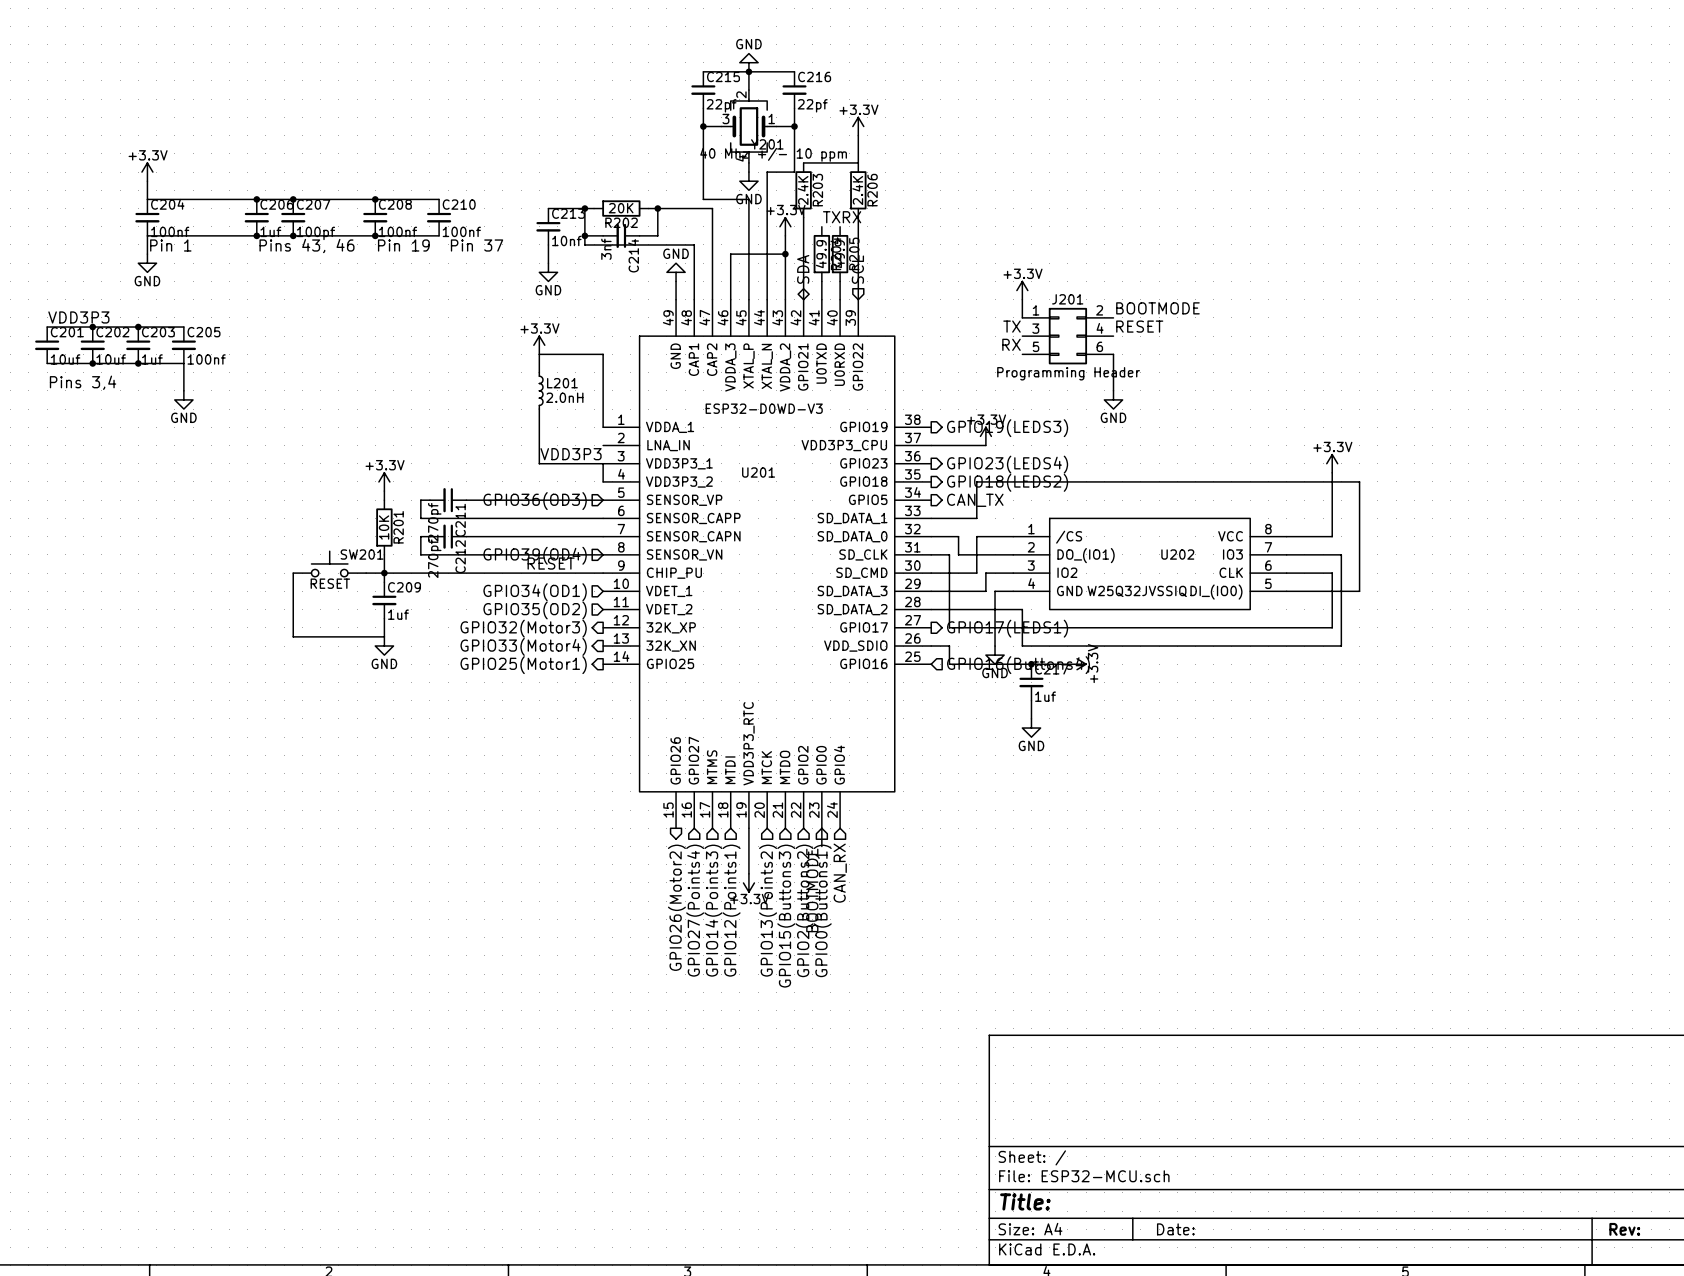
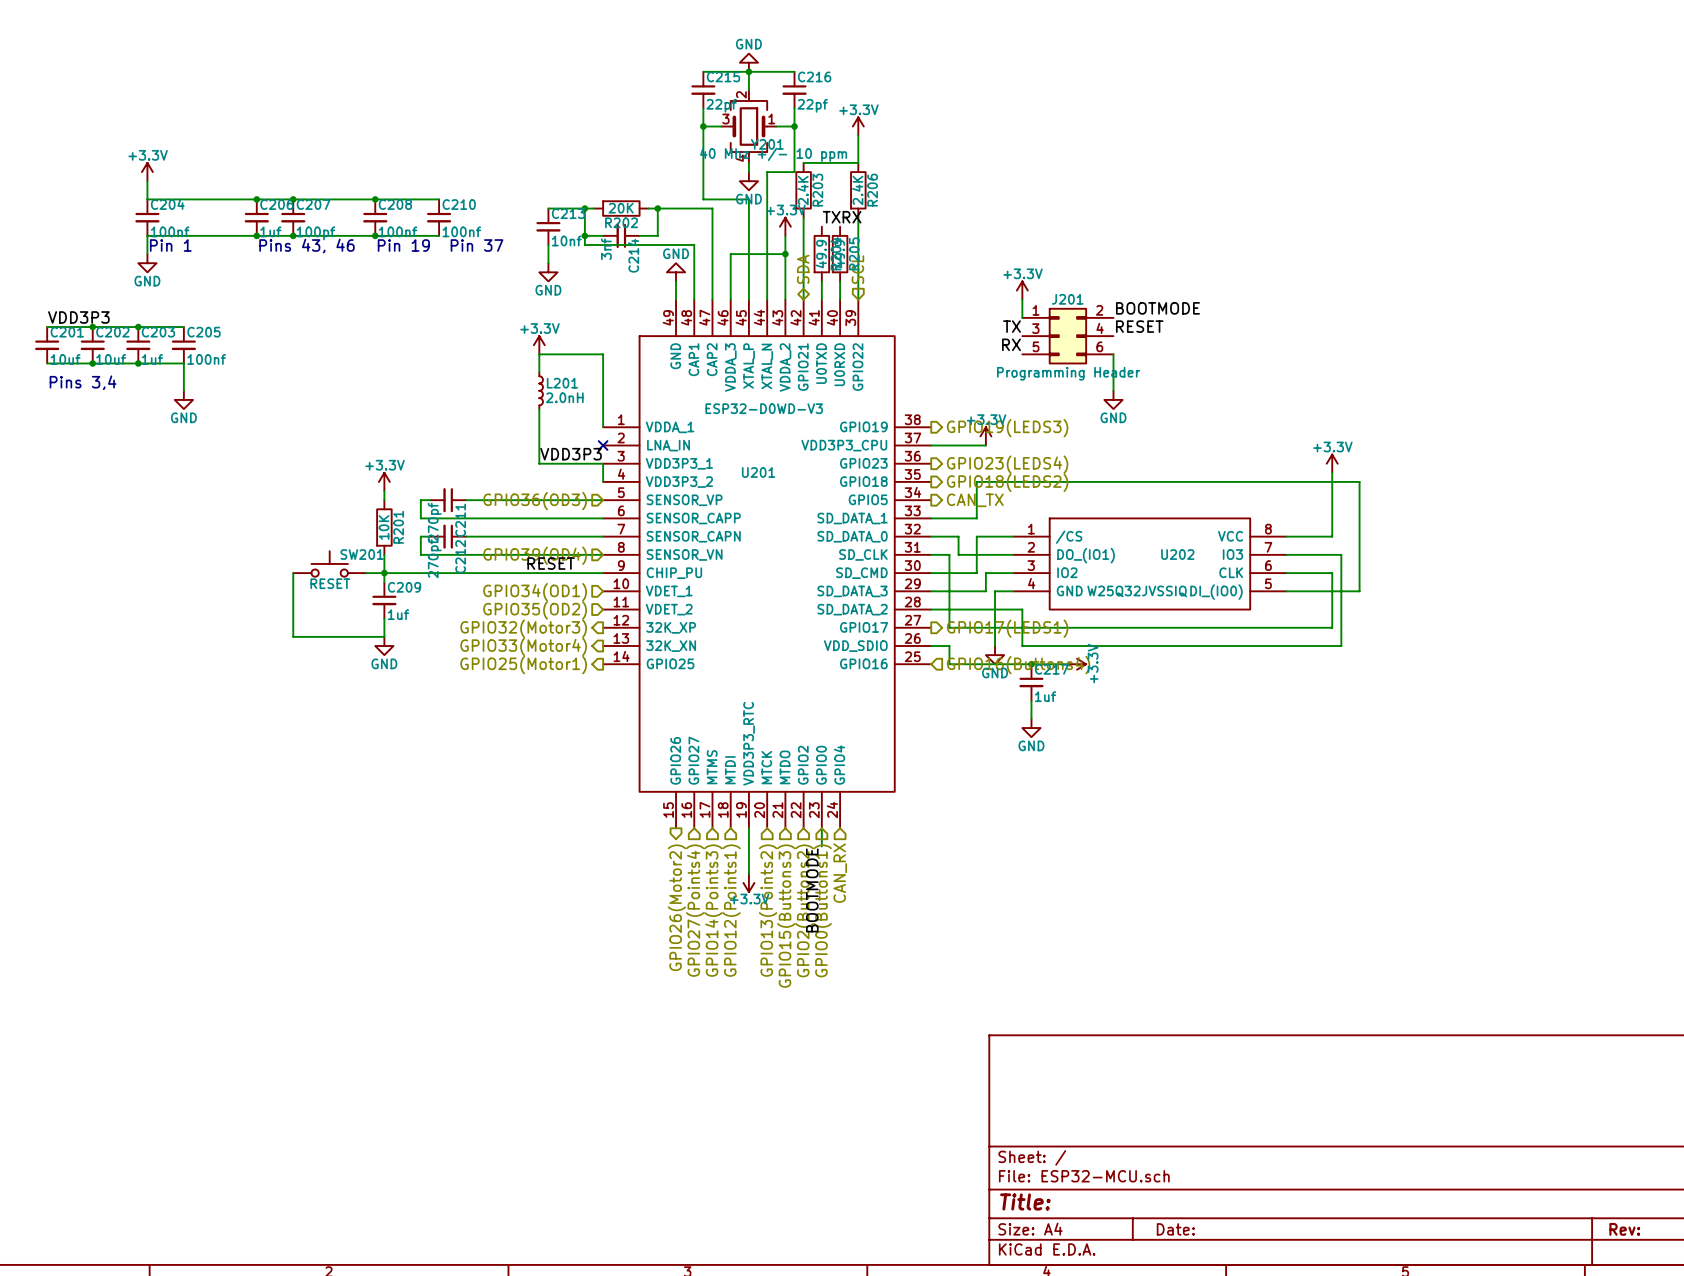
no-connect mark: none -> (603, 445)

